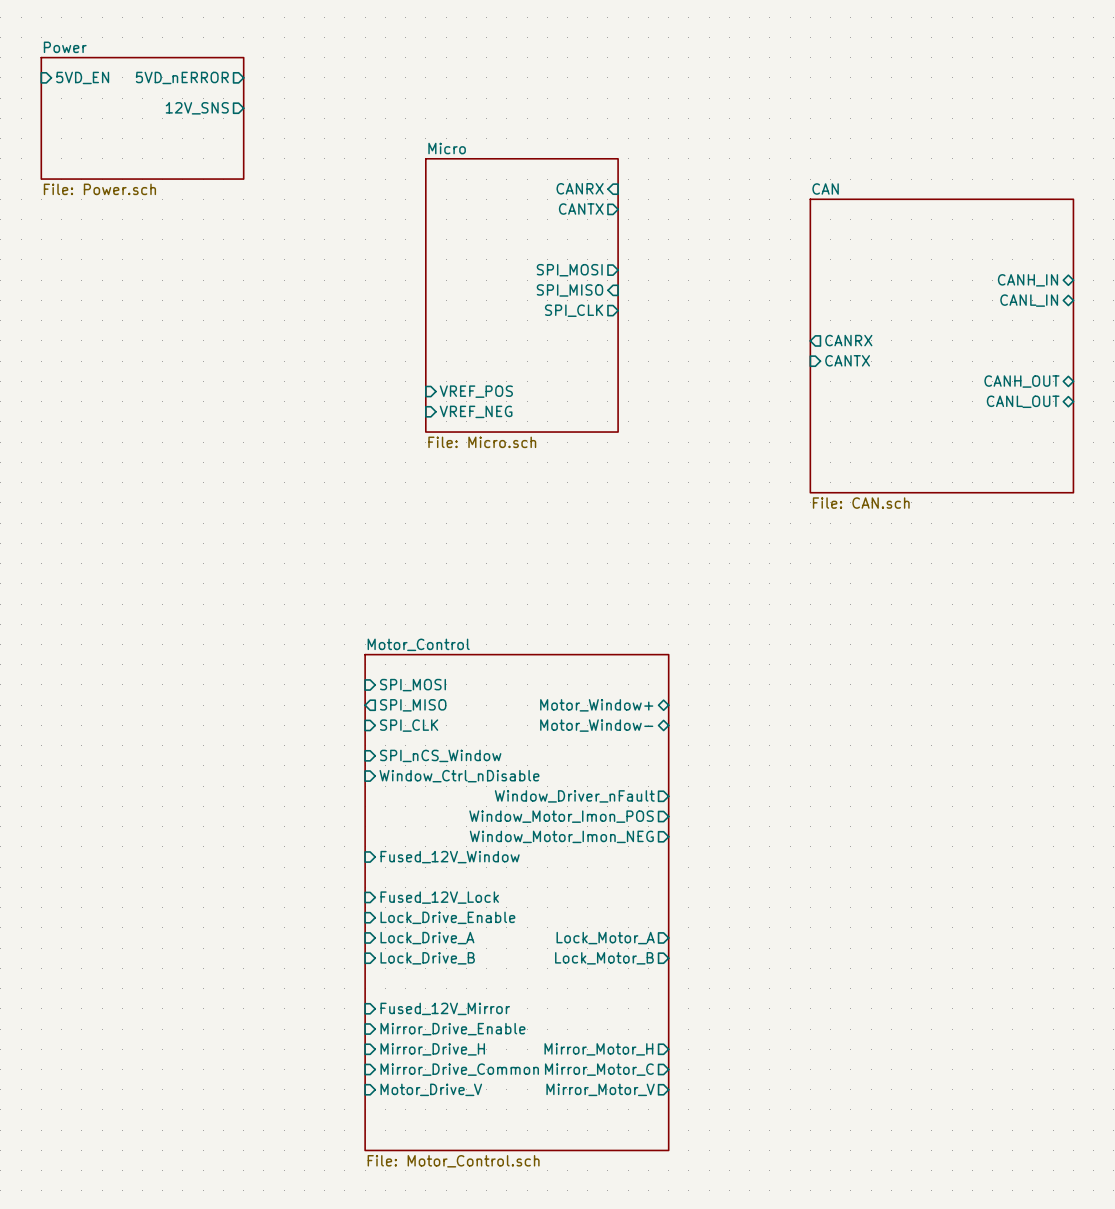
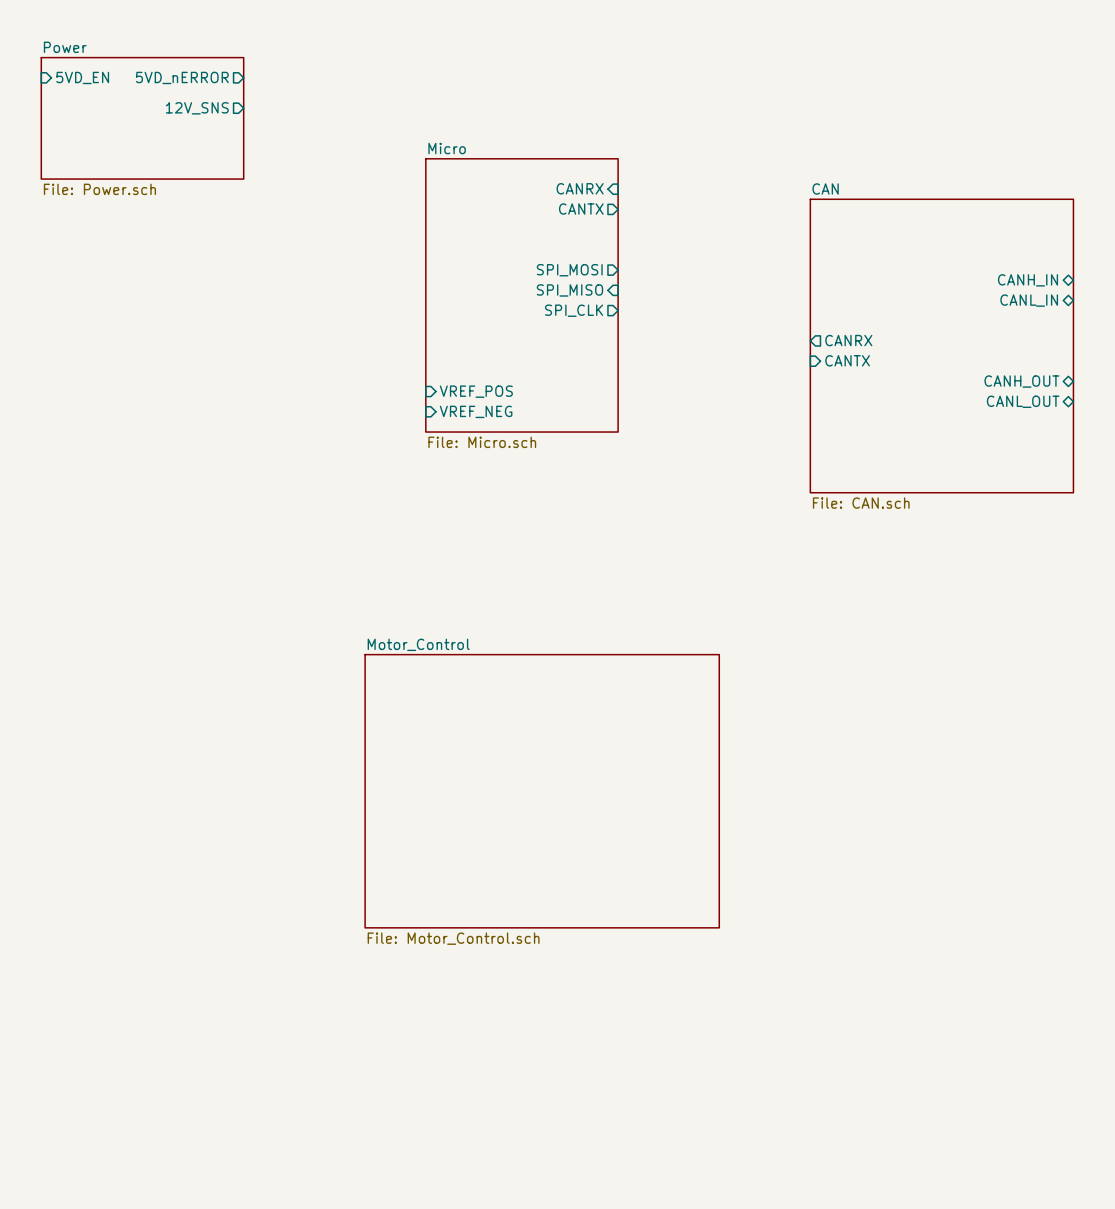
sheet pin: SPI_MOSI (412, 685) -> none
sheet pin: SPI_MISO (413, 705) -> none
sheet pin: Motor_Window+ (596, 705) -> none
sheet pin: SPI_CLK (409, 725) -> none
sheet pin: Motor_Window- (596, 725) -> none
sheet pin: SPI_nCS_Window (440, 755) -> none
sheet pin: Window_Ctrl_nDisable (459, 776) -> none
sheet Motor_Control: none -> File: Motor_Control.sch (542, 791)
sheet pin: Window_Driver_nFault (574, 796) -> none
sheet pin: Window_Motor_Imon_POS (561, 816) -> none
sheet pin: Window_Motor_Imon_NEG (561, 836) -> none
sheet pin: Fused_12V_Window (450, 857) -> none
sheet pin: Fused_12V_Lock (439, 897) -> none
sheet Motor_Control: File: Motor_Control.sch (516, 902) -> none
sheet pin: Lock_Drive_Enable (447, 917) -> none
sheet pin: Lock_Drive_A (427, 938) -> none
sheet pin: Lock_Motor_A (605, 938) -> none
sheet pin: Lock_Drive_B (427, 958) -> none
sheet pin: Lock_Motor_B (604, 958) -> none
sheet pin: Fused_12V_Mirror (445, 1008) -> none
sheet pin: Mirror_Drive_Enable (452, 1029) -> none
sheet pin: Mirror_Drive_H (432, 1049) -> none
sheet pin: Mirror_Motor_H (598, 1049) -> none
sheet pin: Mirror_Drive_Common (459, 1069) -> none
sheet pin: Mirror_Motor_C (599, 1069) -> none
sheet pin: Motor_Drive_V (431, 1089) -> none
sheet pin: Mirror_Motor_V (600, 1089) -> none

